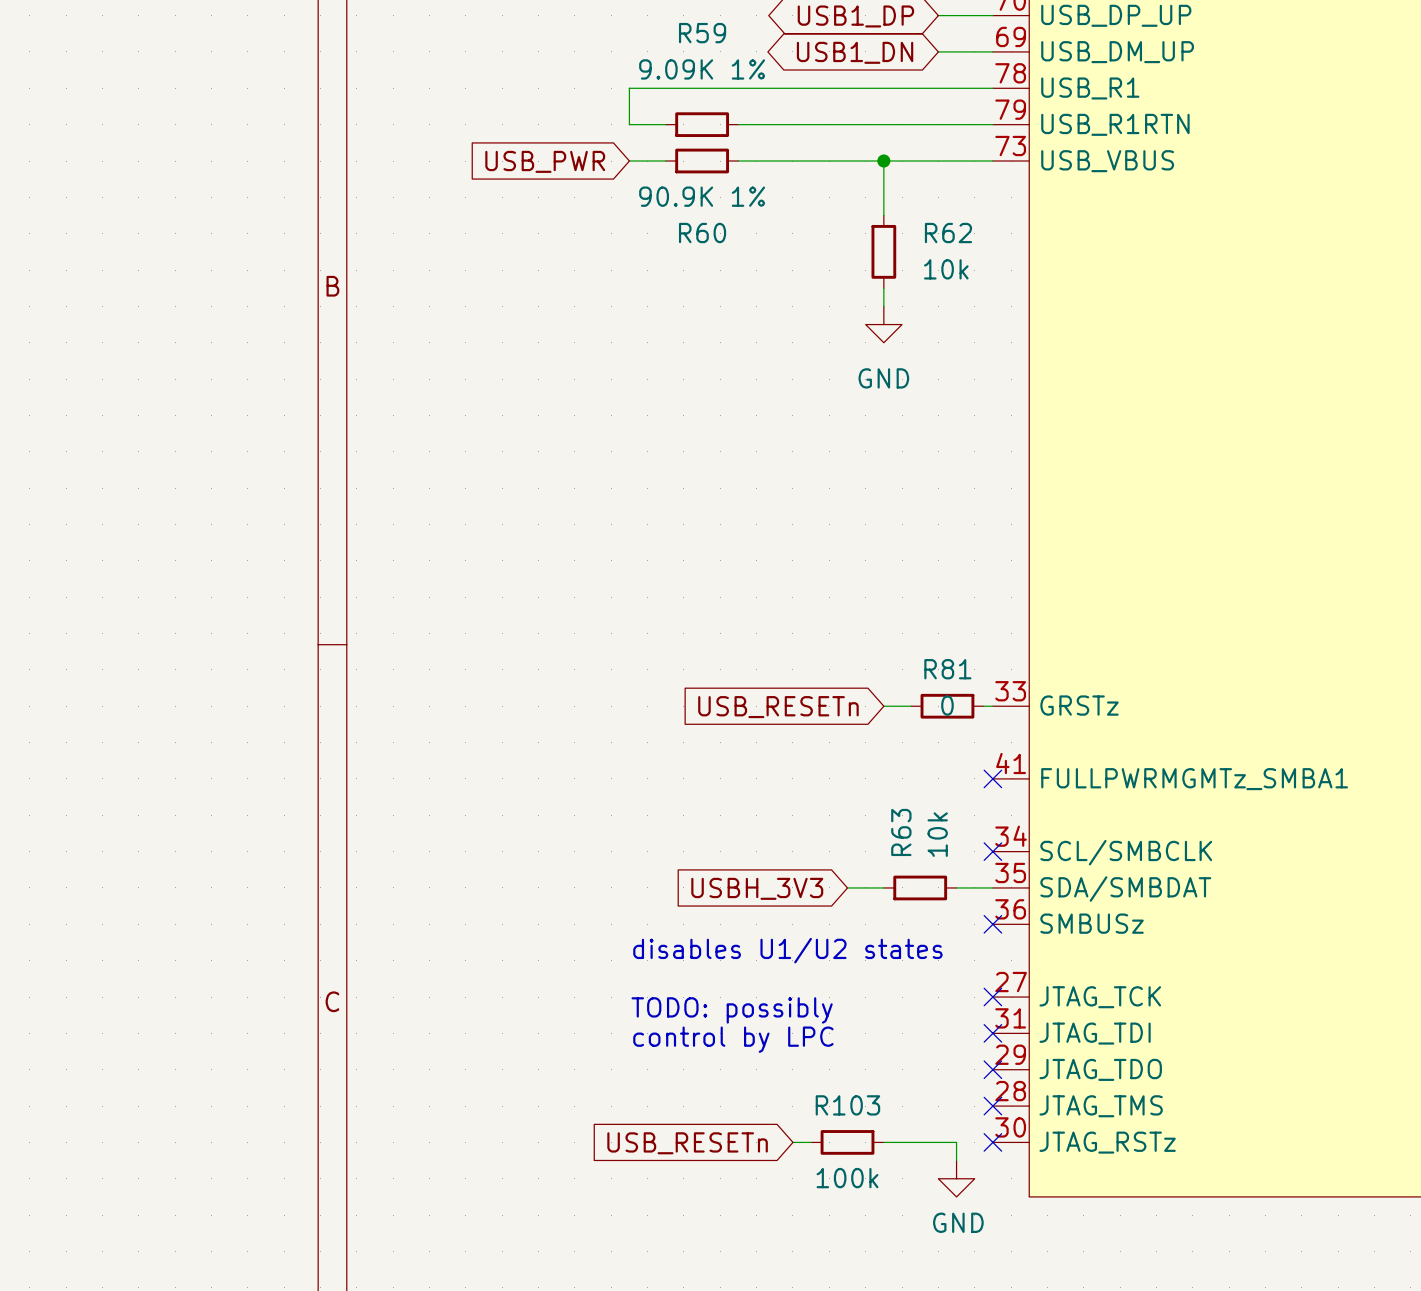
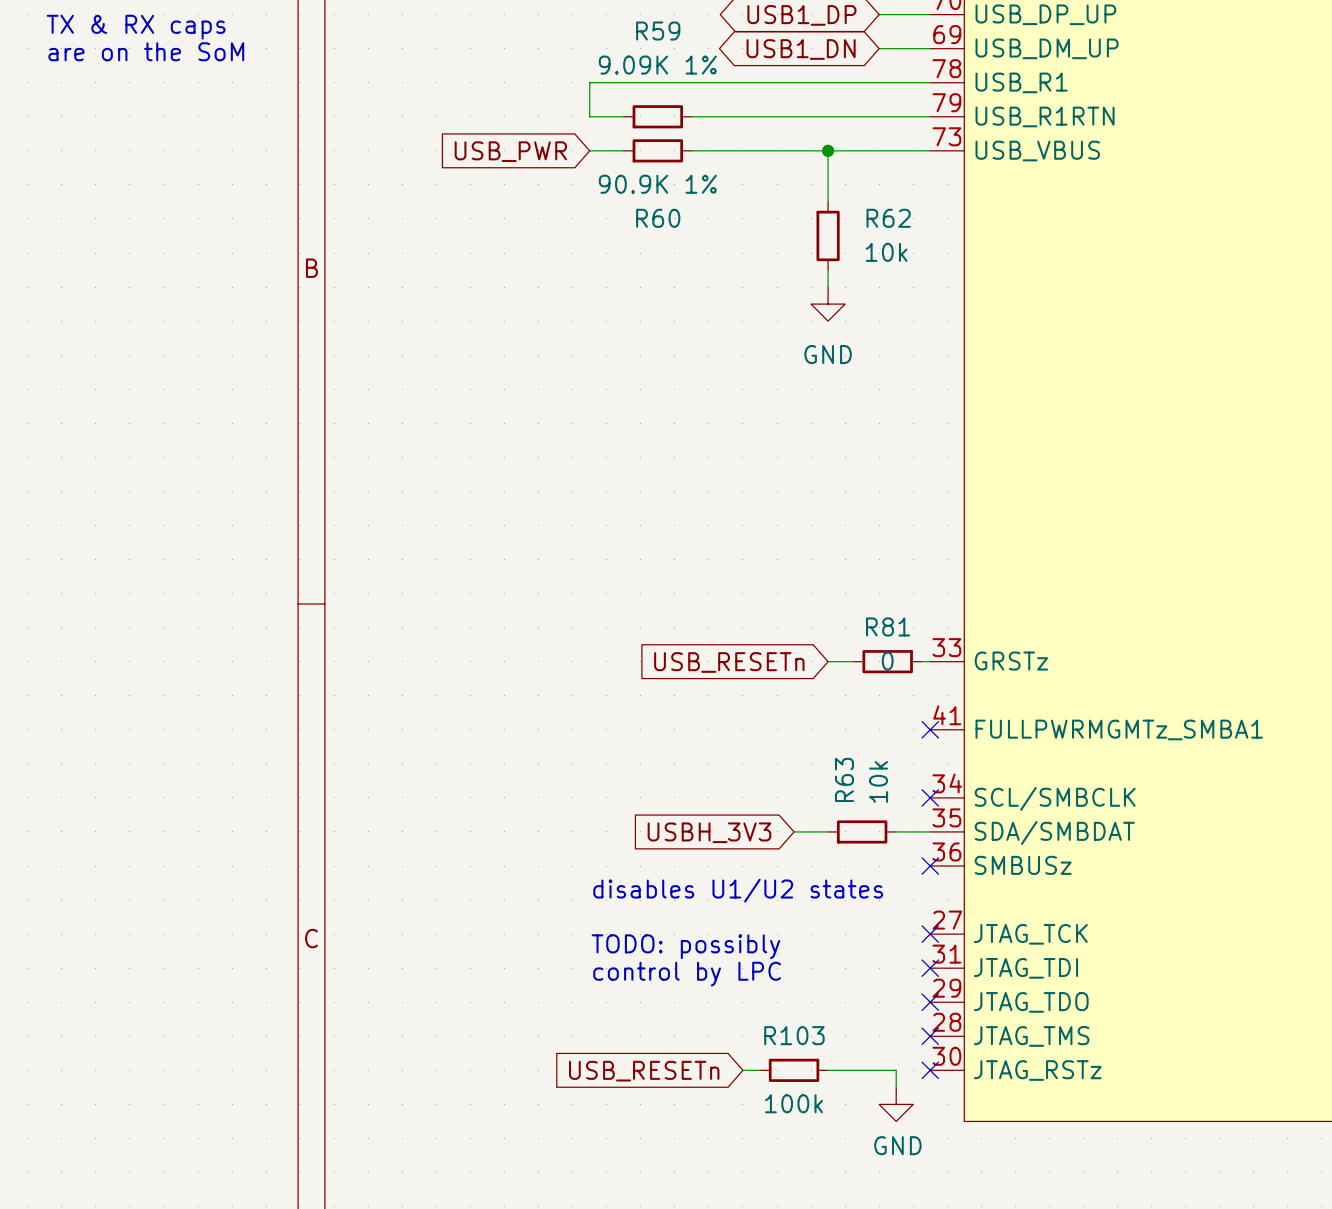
text: none -> TX & RX caps (136, 27)
text: none -> are on the SoM (146, 51)

